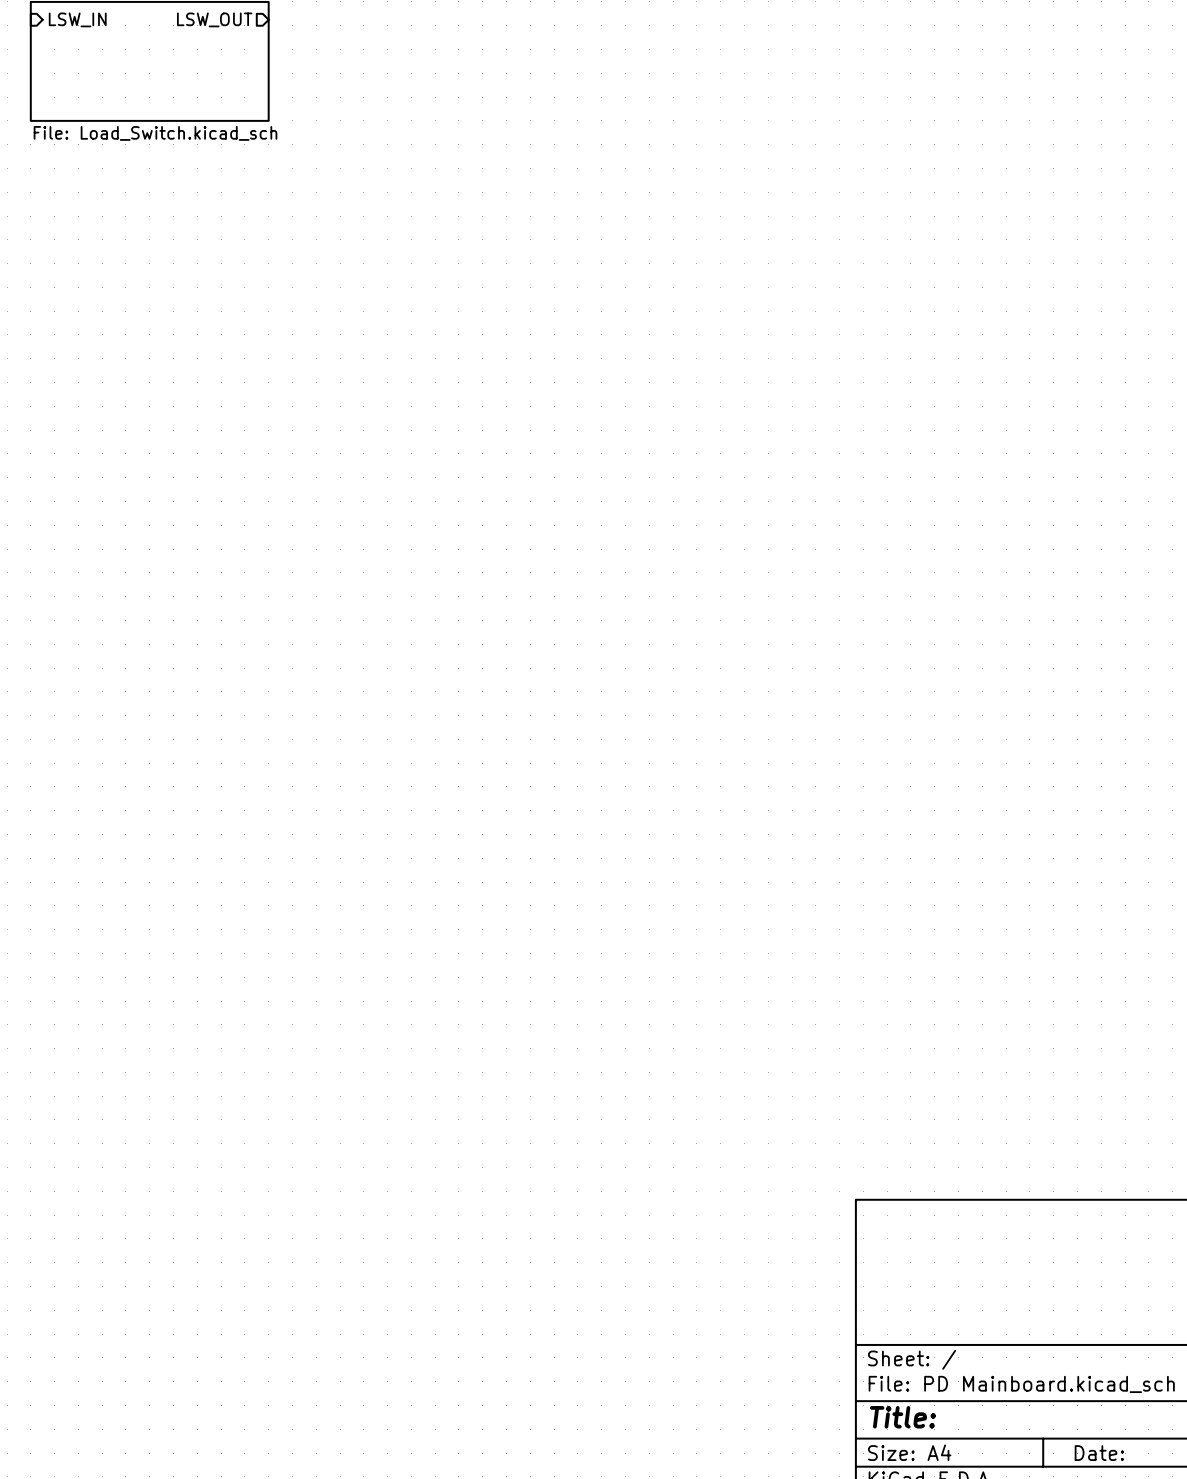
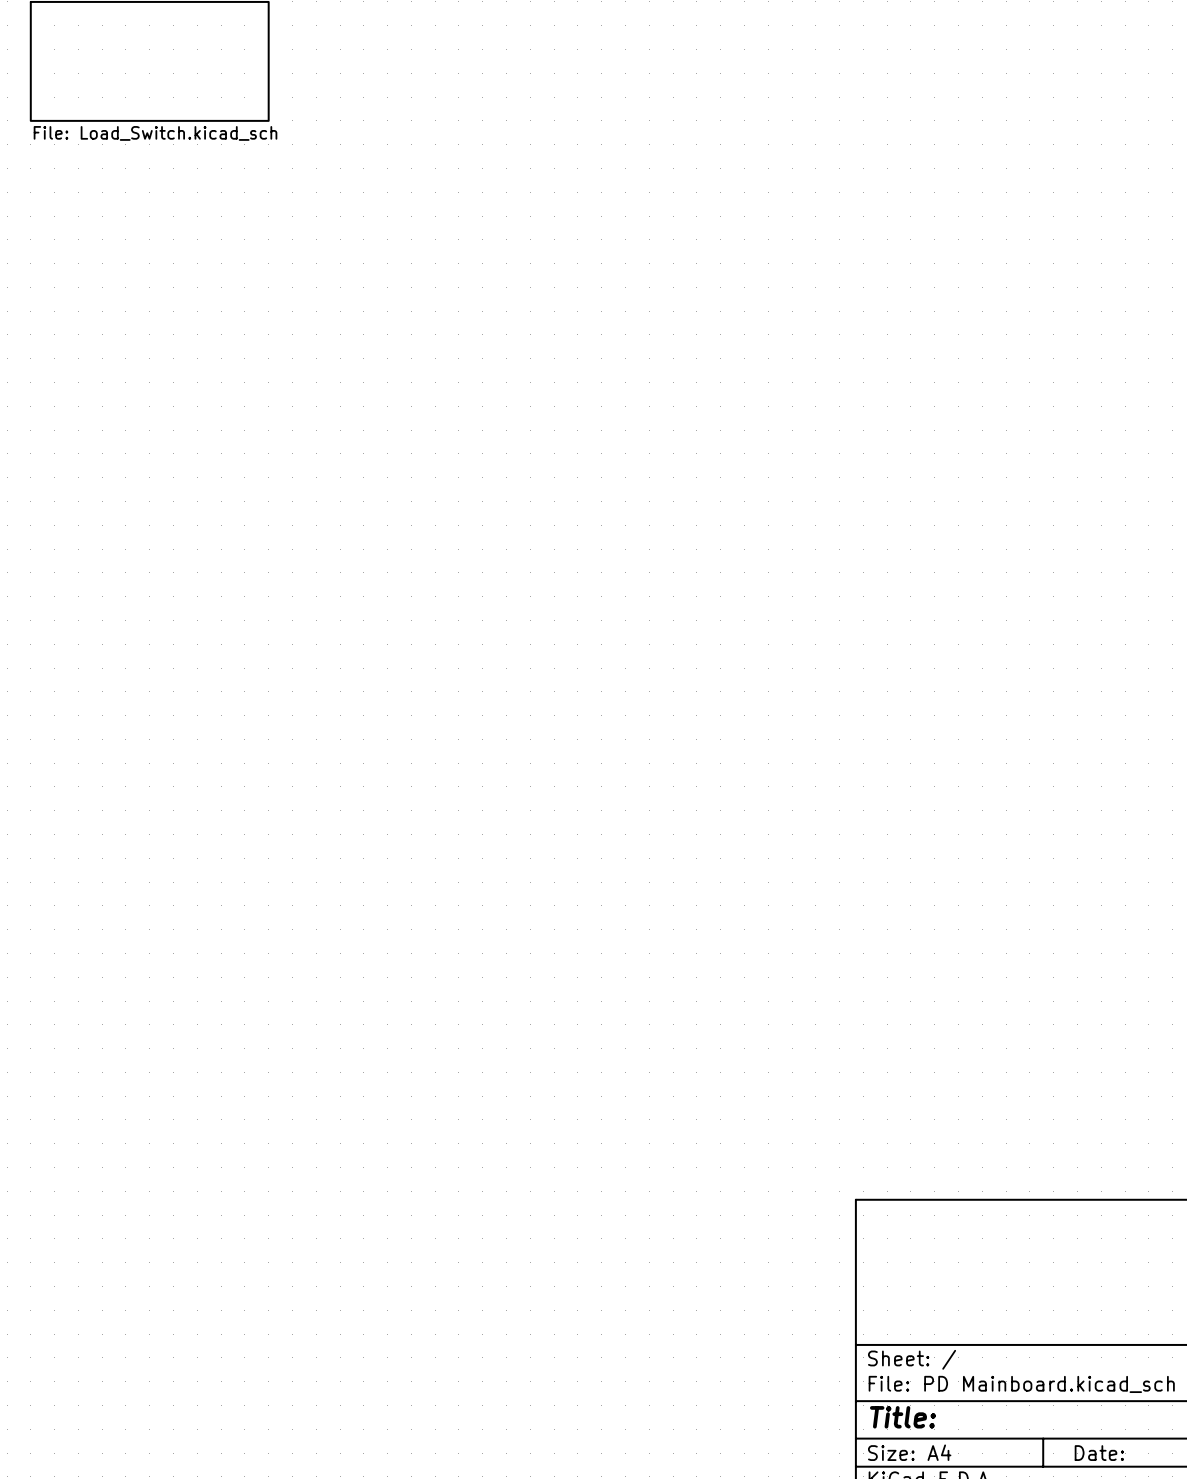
sheet pin: LSW_IN (77, 19) -> none
sheet pin: LSW_OUT (214, 19) -> none

